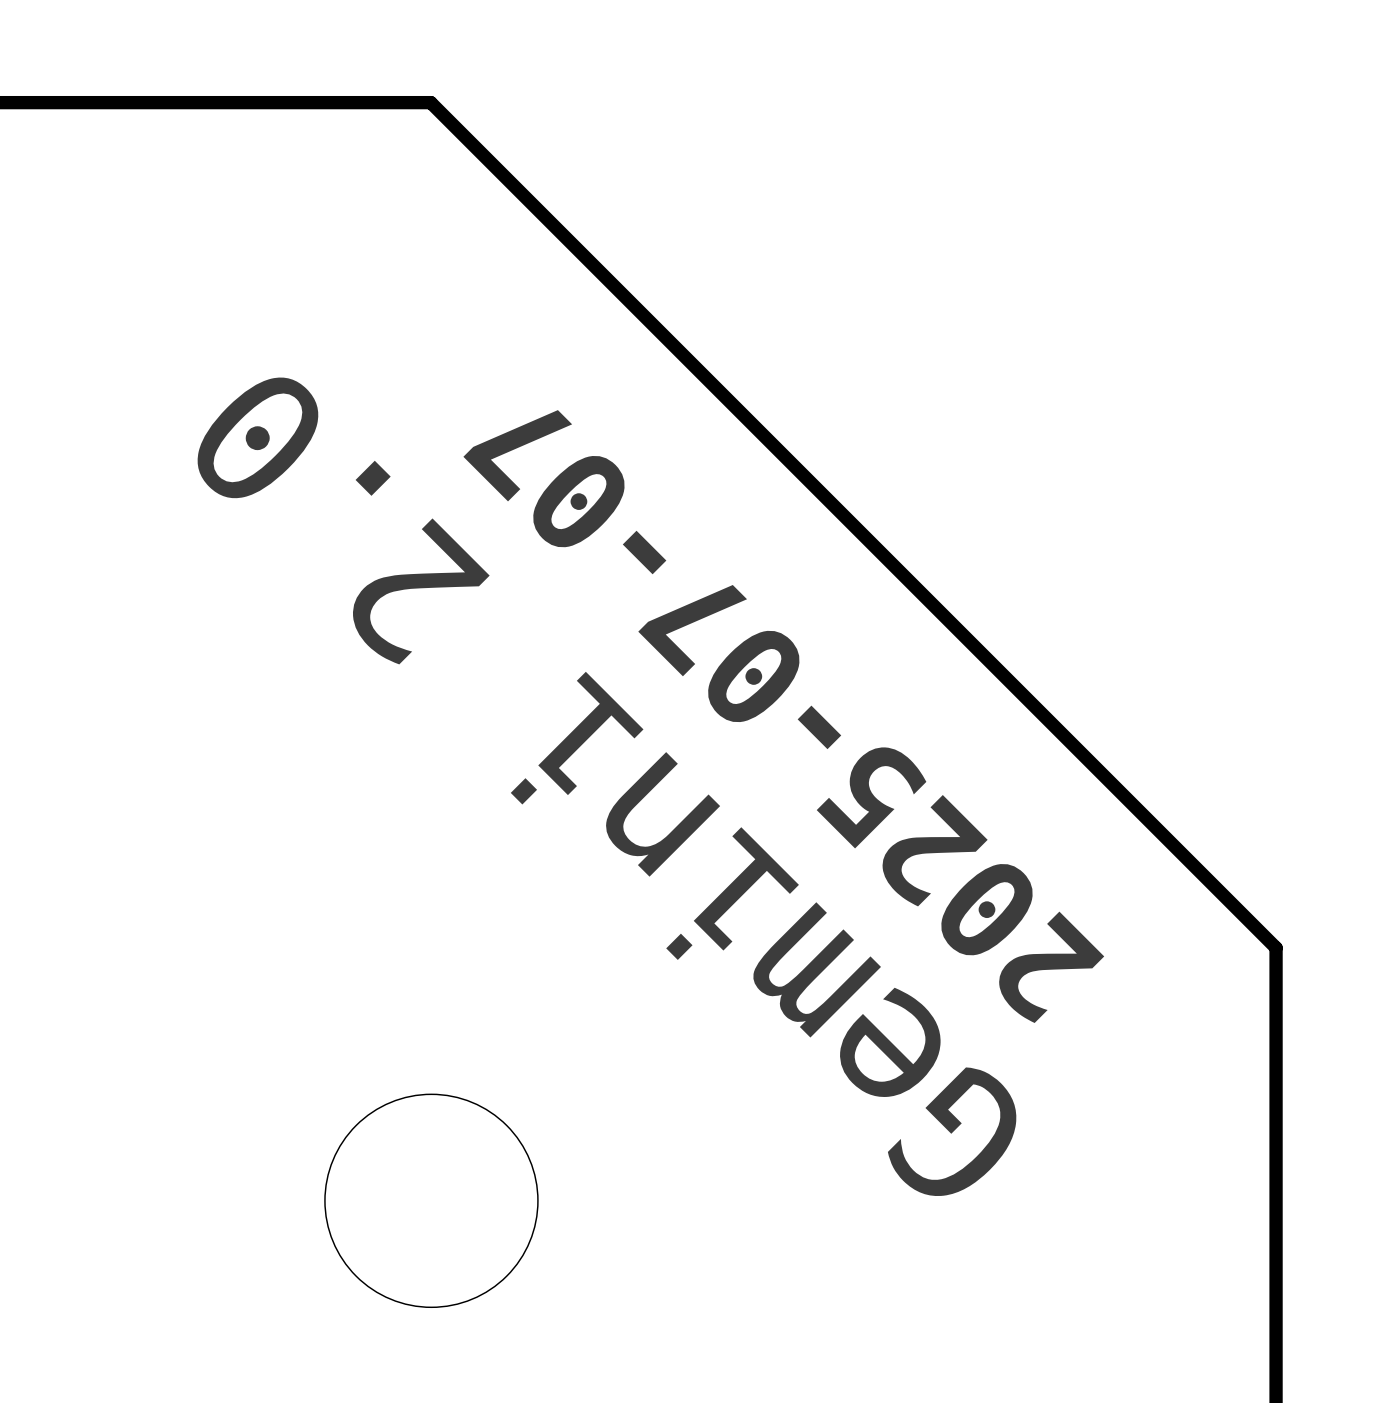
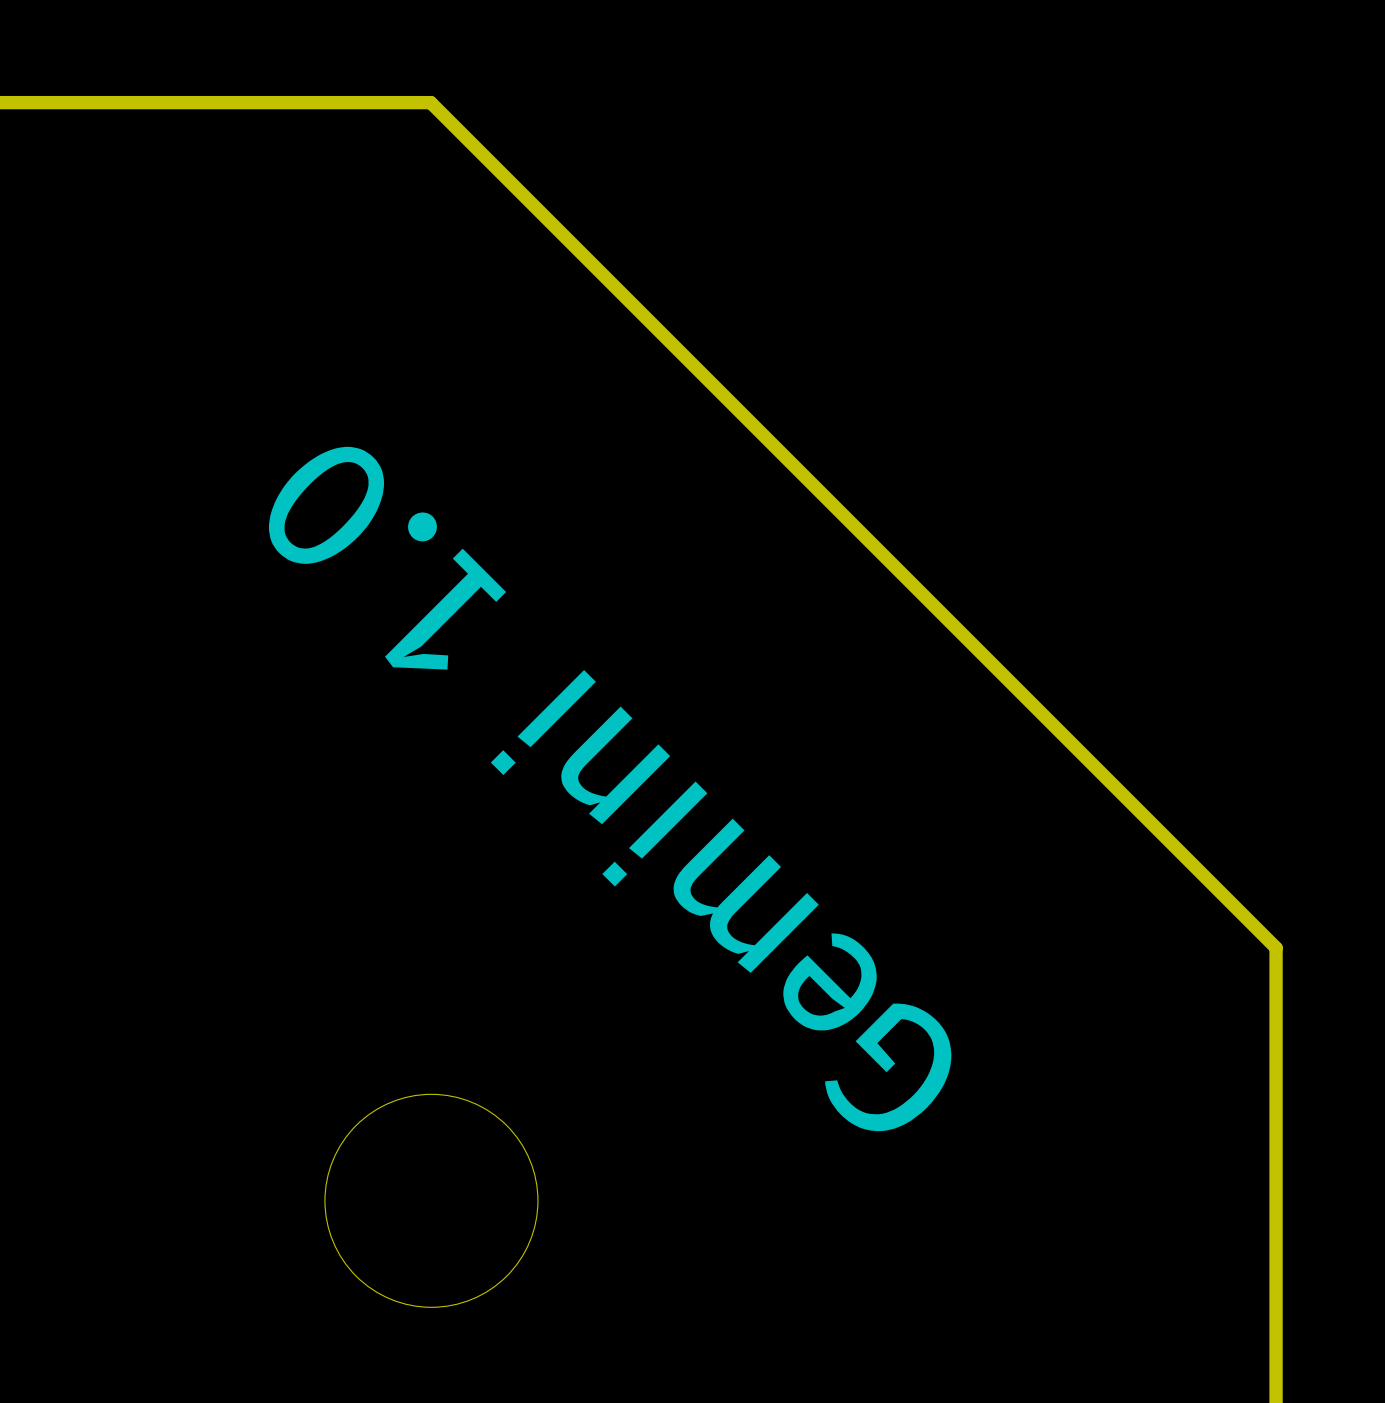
text: 2025-07-07 (783, 716) -> none
text: Gemini 2.0 (606, 786) -> Gemini 1.0 (610, 789)

